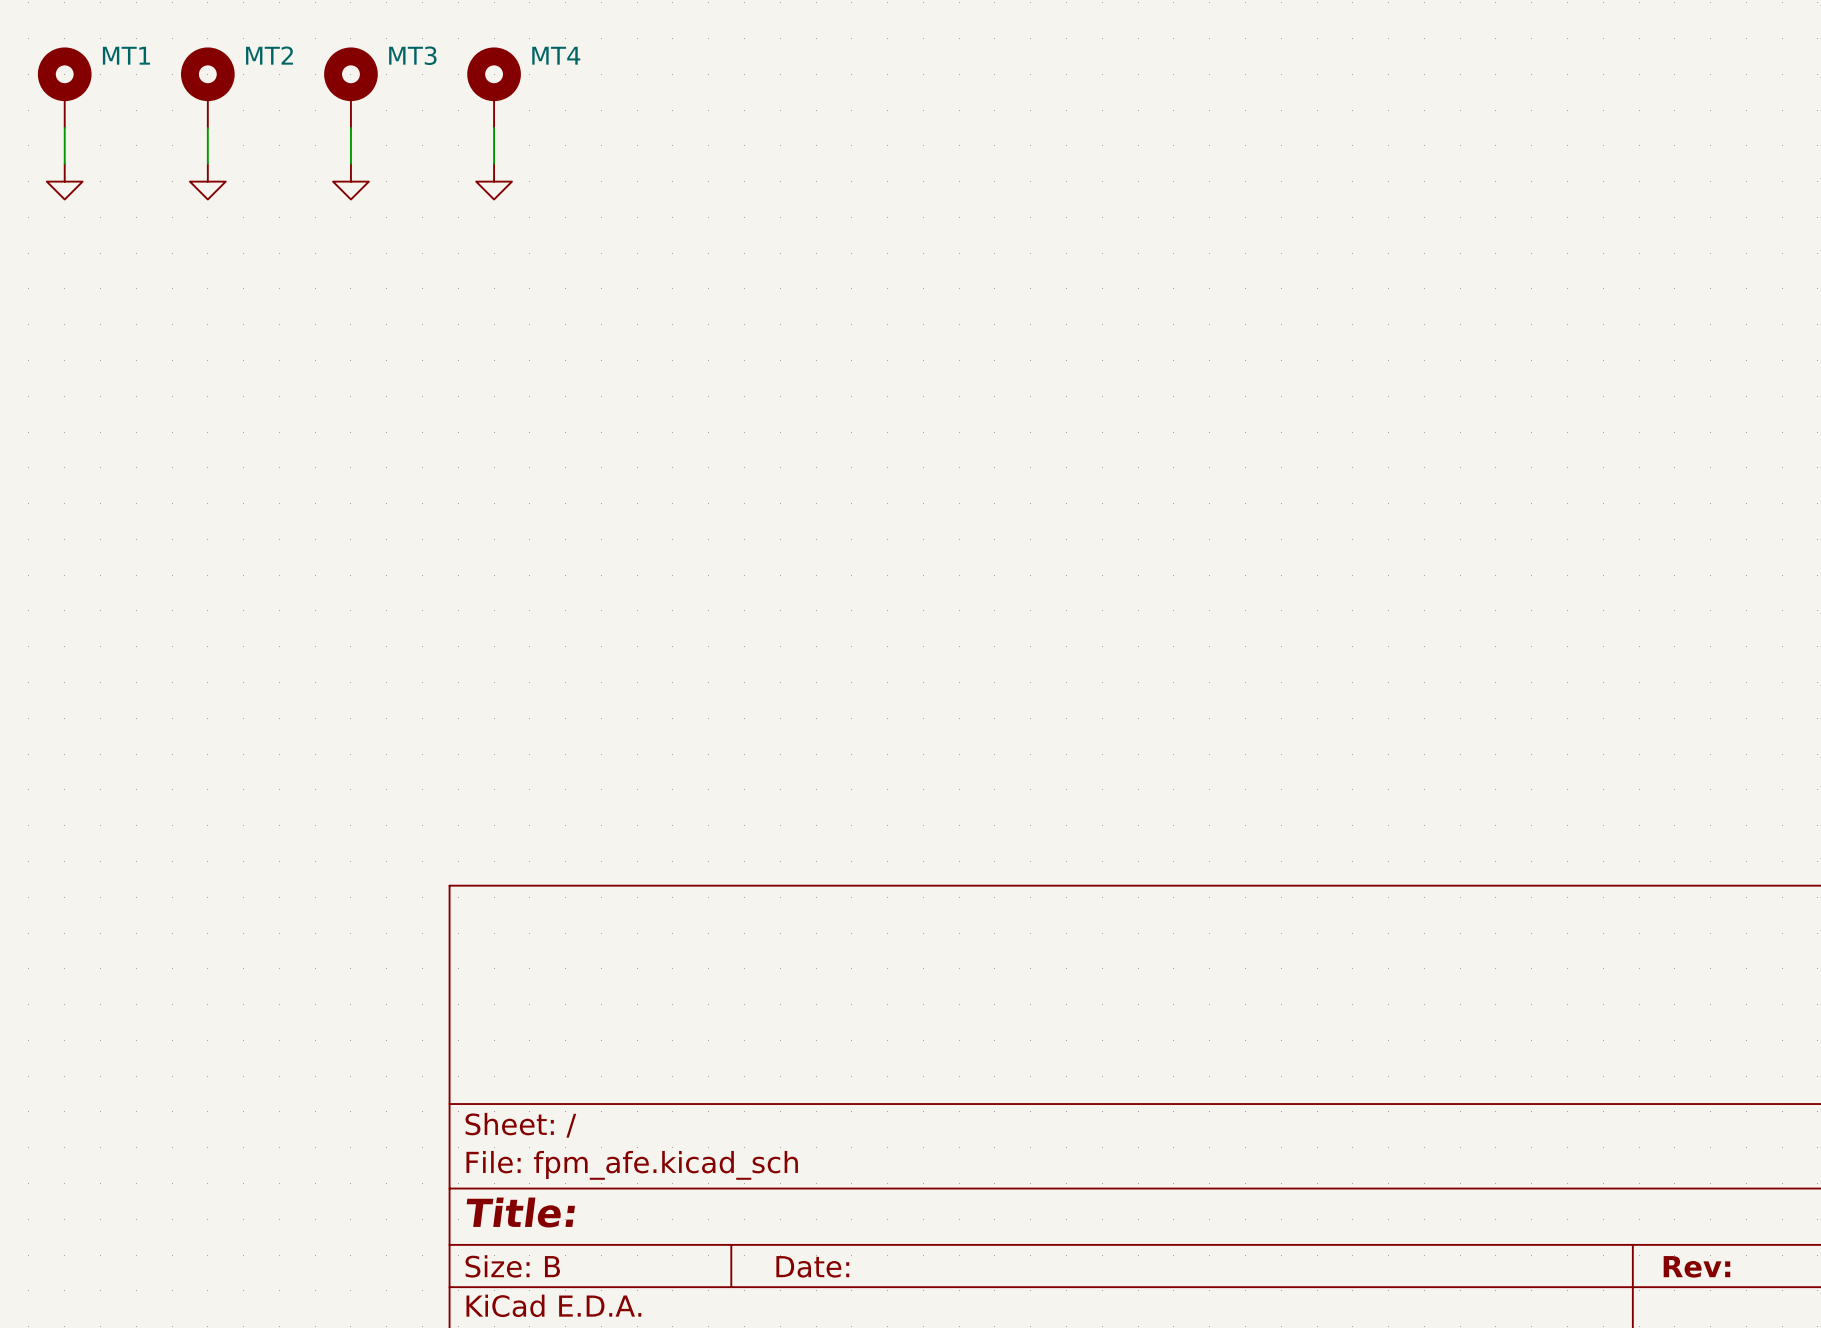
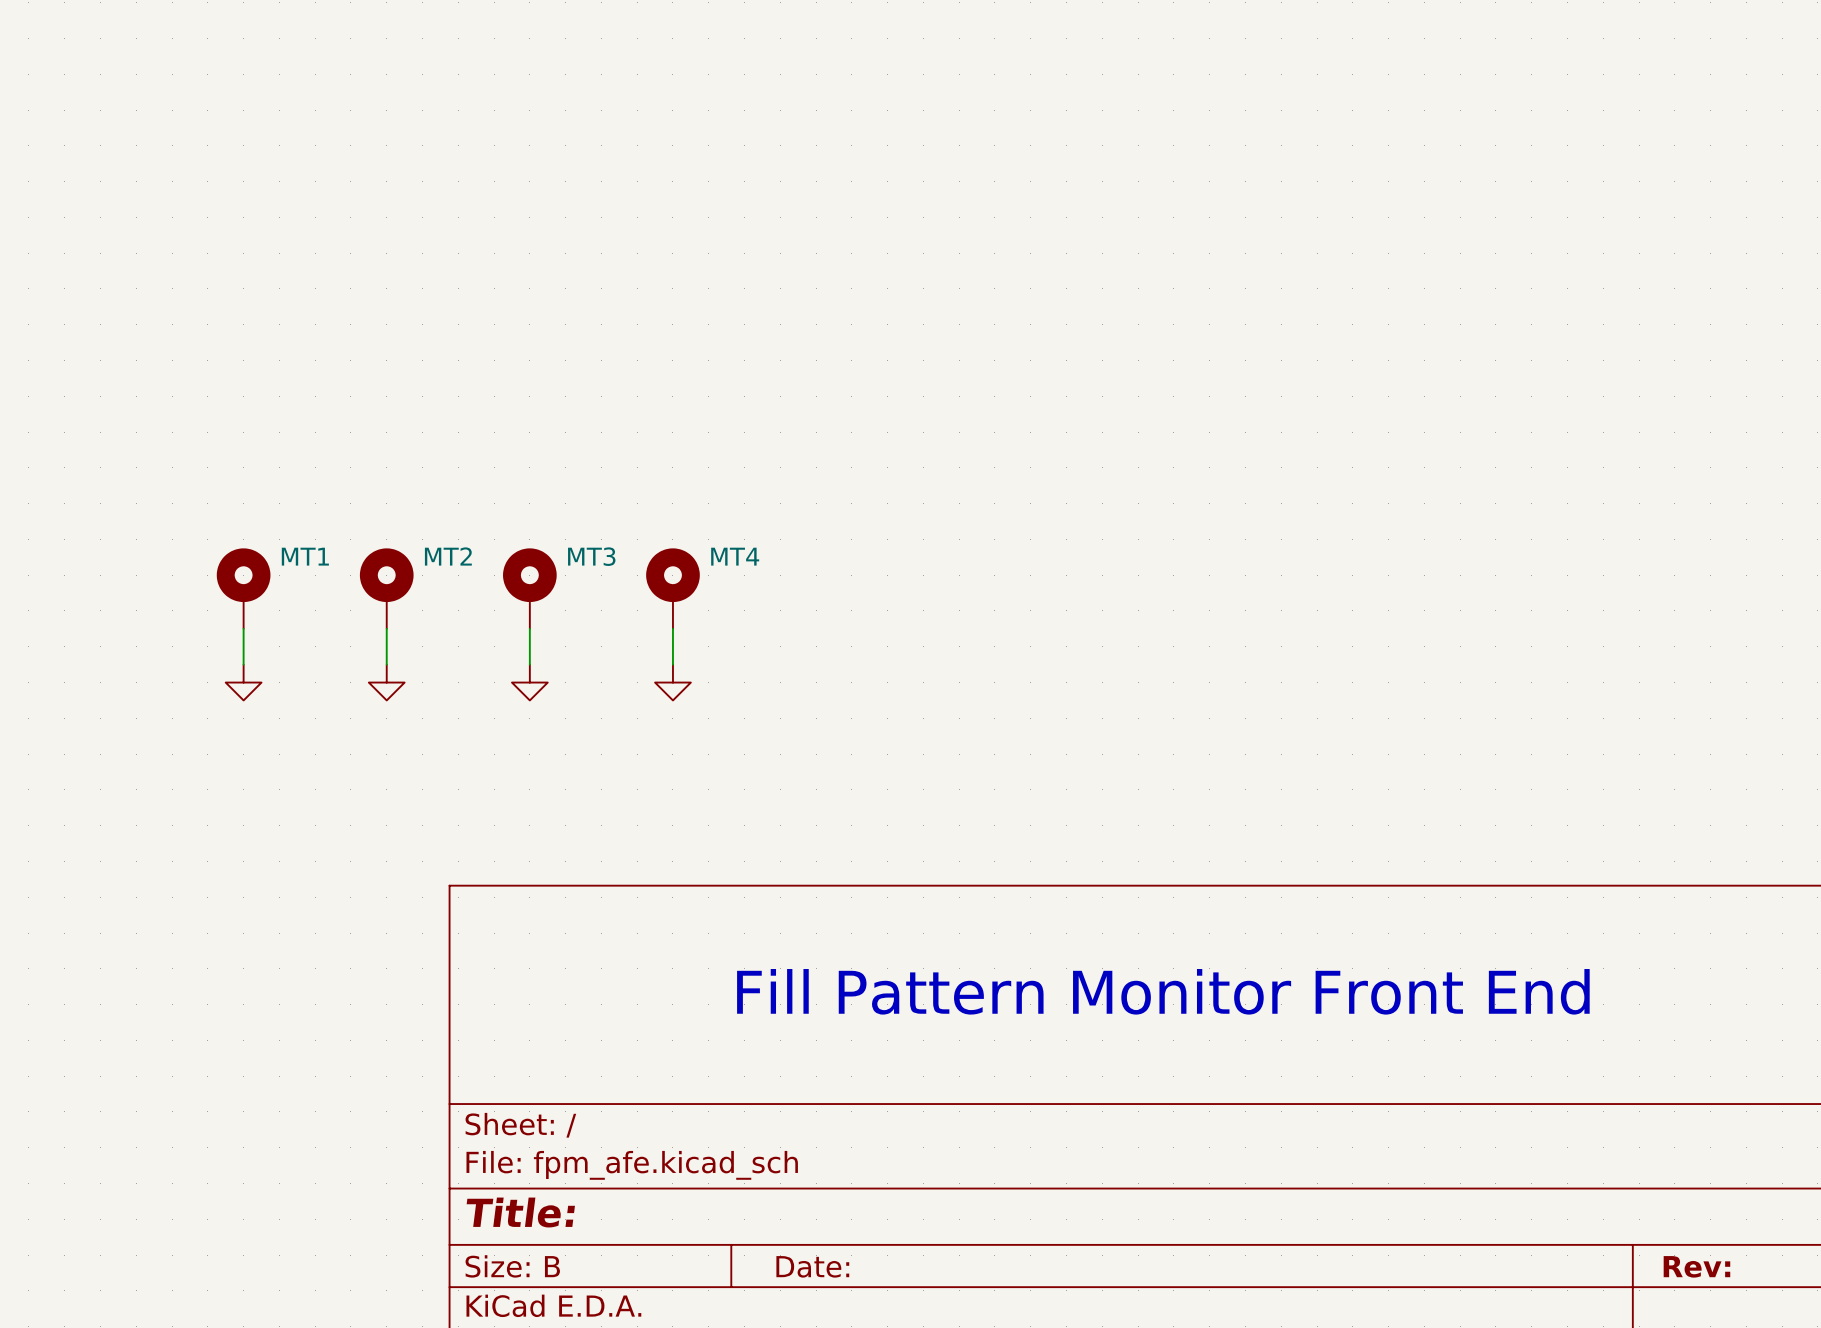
MT1 position: (64, 87) -> (243, 588)
MT2 position: (207, 87) -> (386, 588)
MT3 position: (350, 87) -> (529, 588)
MT4 position: (494, 87) -> (672, 588)
wire: (64, 127) (64, 163) -> none
wire: (207, 127) (207, 163) -> none
wire: (350, 127) (350, 163) -> none
wire: (494, 127) (494, 163) -> none
power symbol: (64, 181) -> none
power symbol: (207, 181) -> none
power symbol: (350, 181) -> none
power symbol: (494, 181) -> none
wire: none -> (243, 628) (243, 664)
wire: none -> (386, 628) (386, 664)
wire: none -> (529, 628) (529, 664)
wire: none -> (672, 628) (672, 664)
power symbol: none -> (243, 682)
power symbol: none -> (386, 682)
power symbol: none -> (529, 682)
power symbol: none -> (672, 682)
text: none -> Fill Pattern Monitor Front End (1163, 991)

